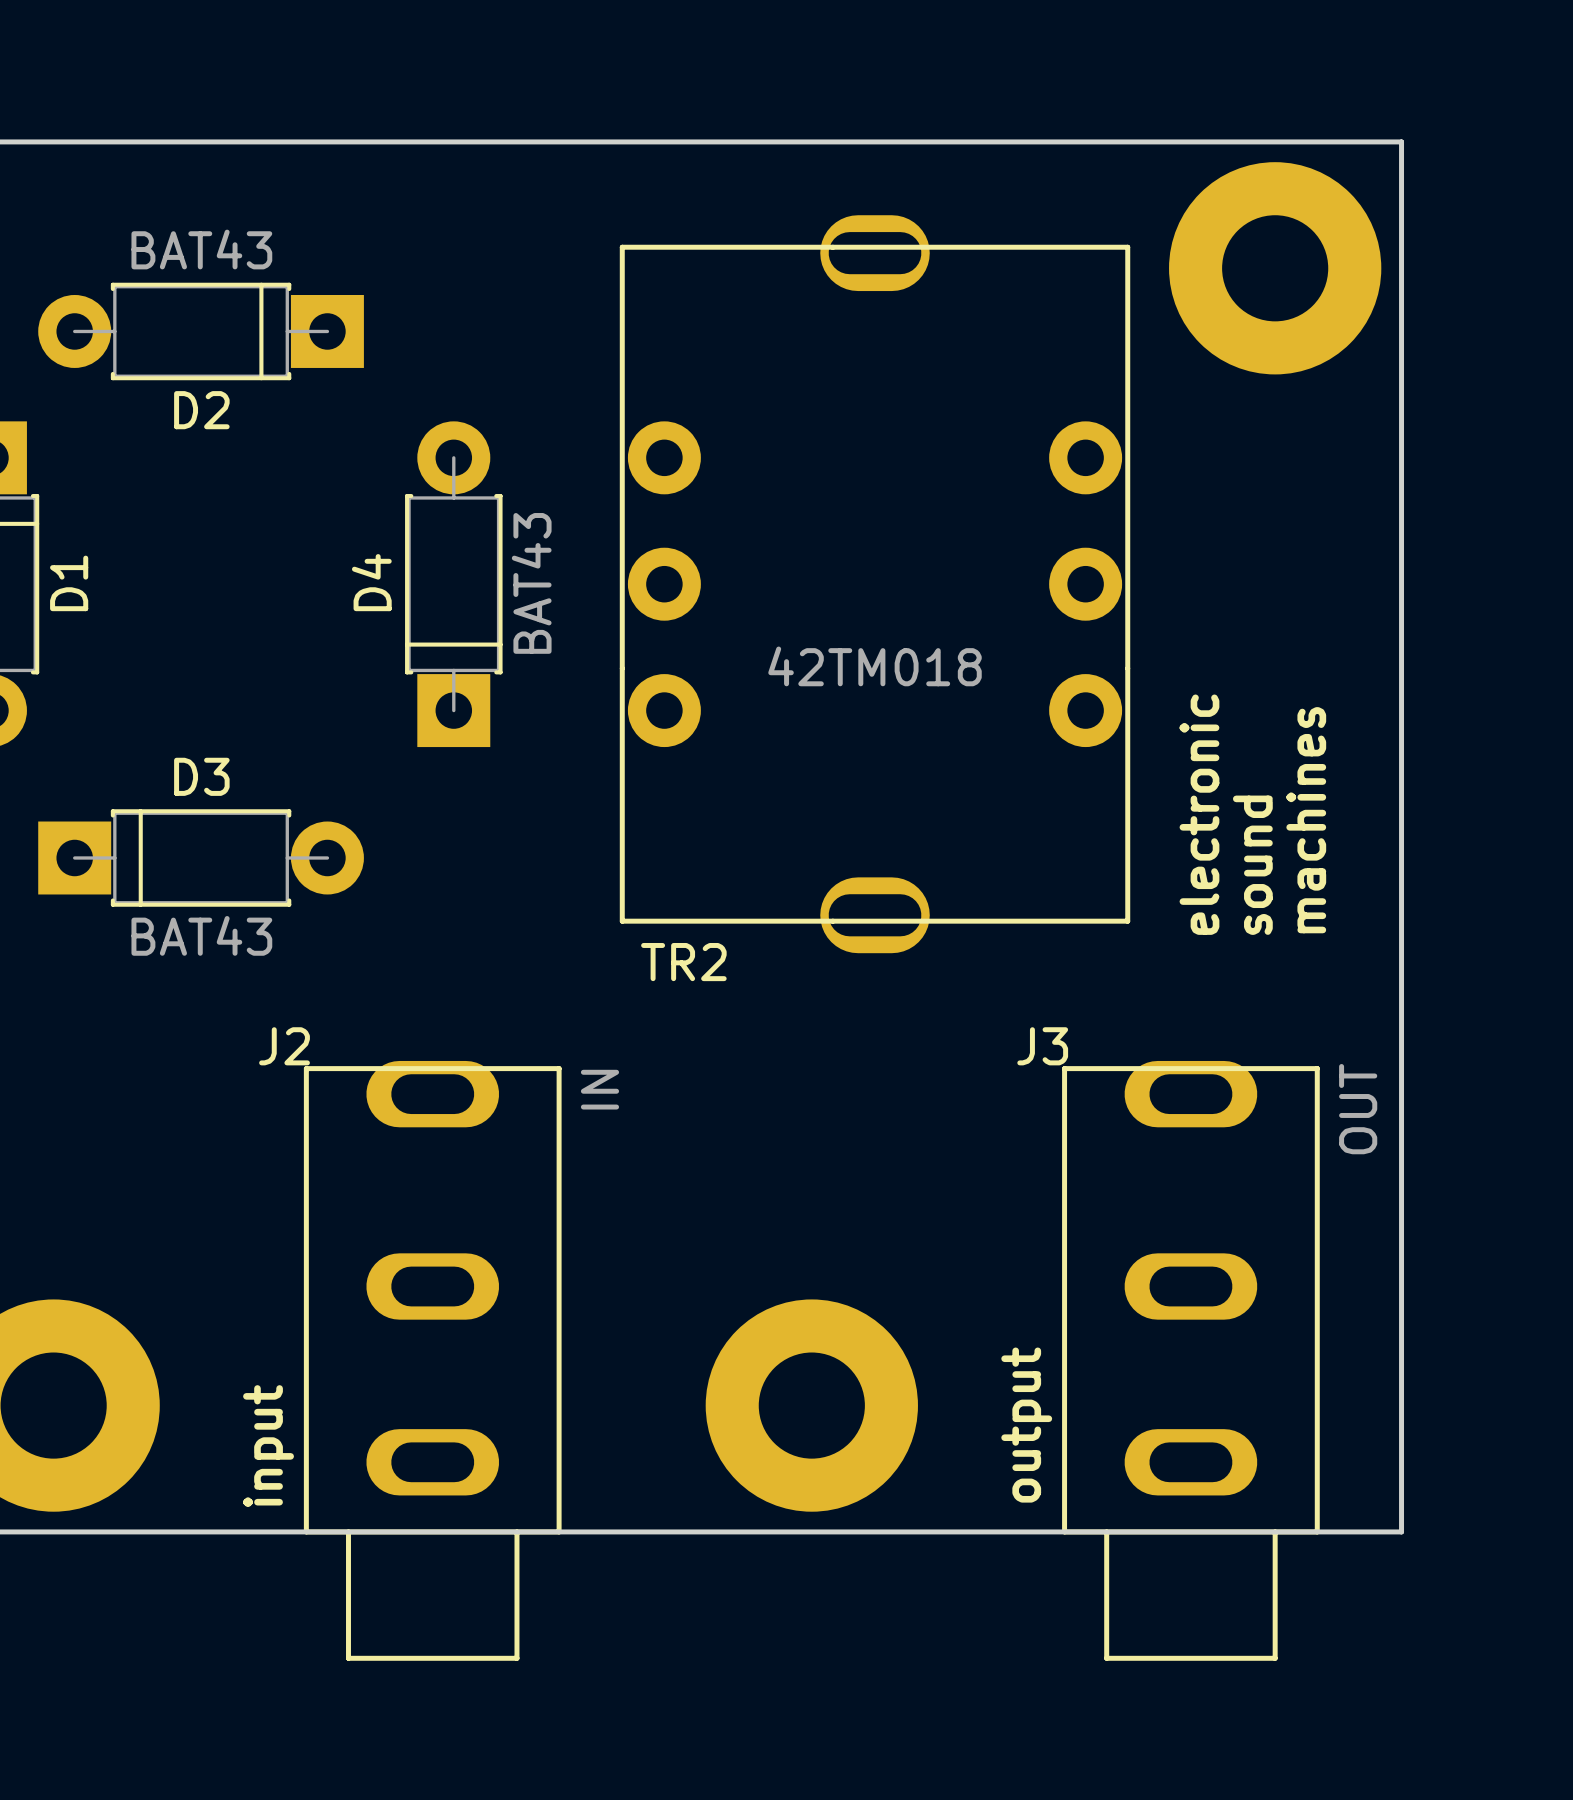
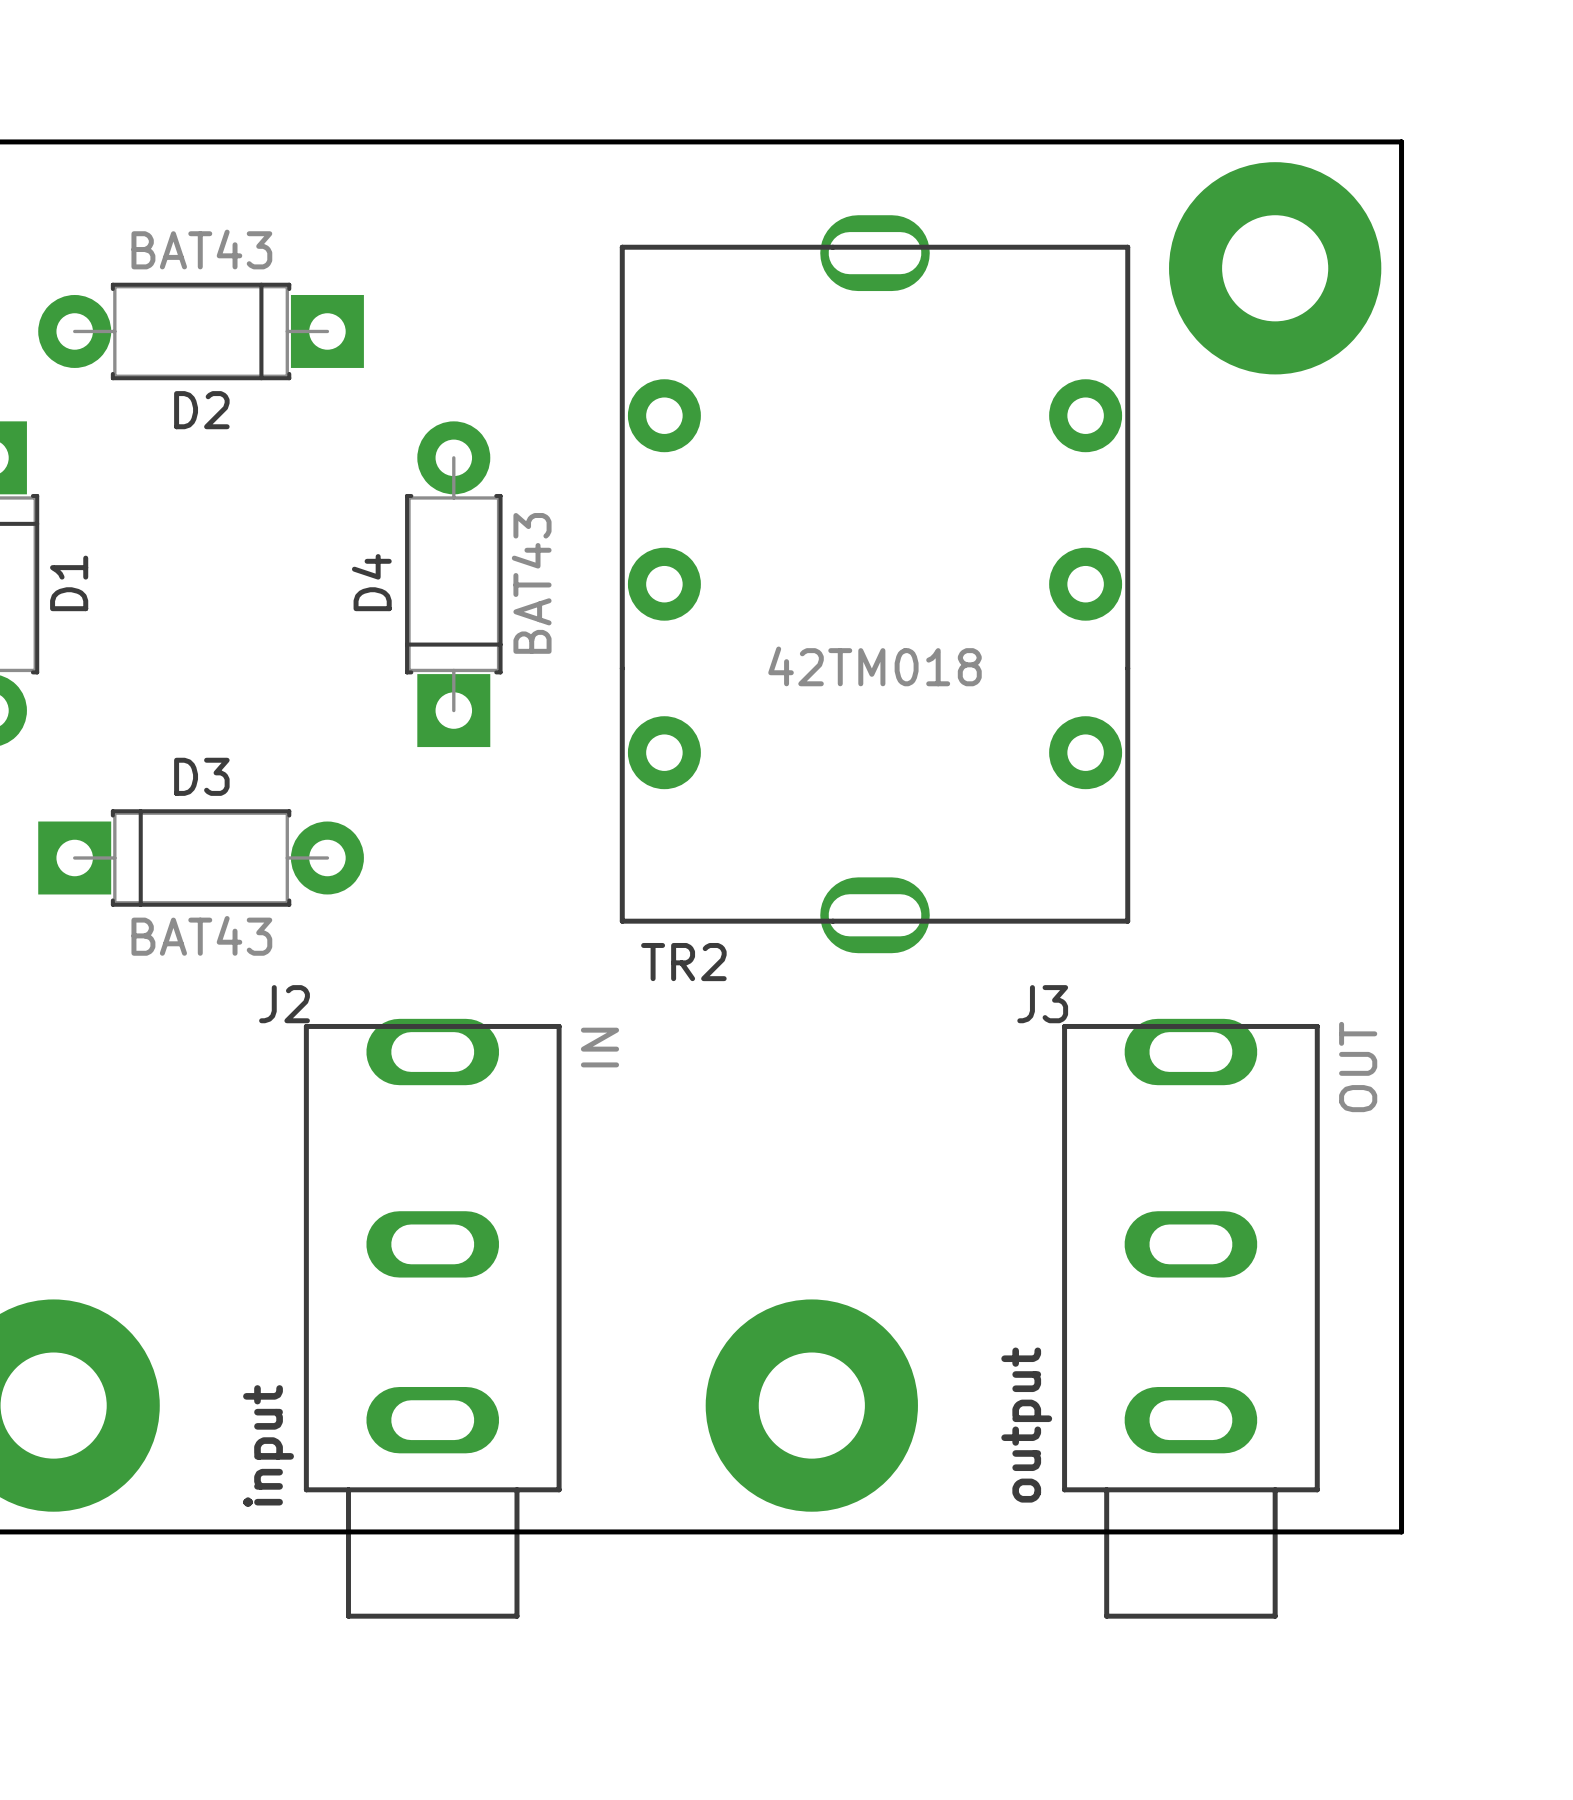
TR2 footprint: [619, 215, 1131, 954] -> [619, 215, 1131, 954]
text: electronic (1199, 814) -> none
text: machines (1306, 820) -> none
text: sound (1252, 865) -> none
J2 position: (432, 1360) -> (432, 1318)
J3 position: (1190, 1360) -> (1190, 1318)

